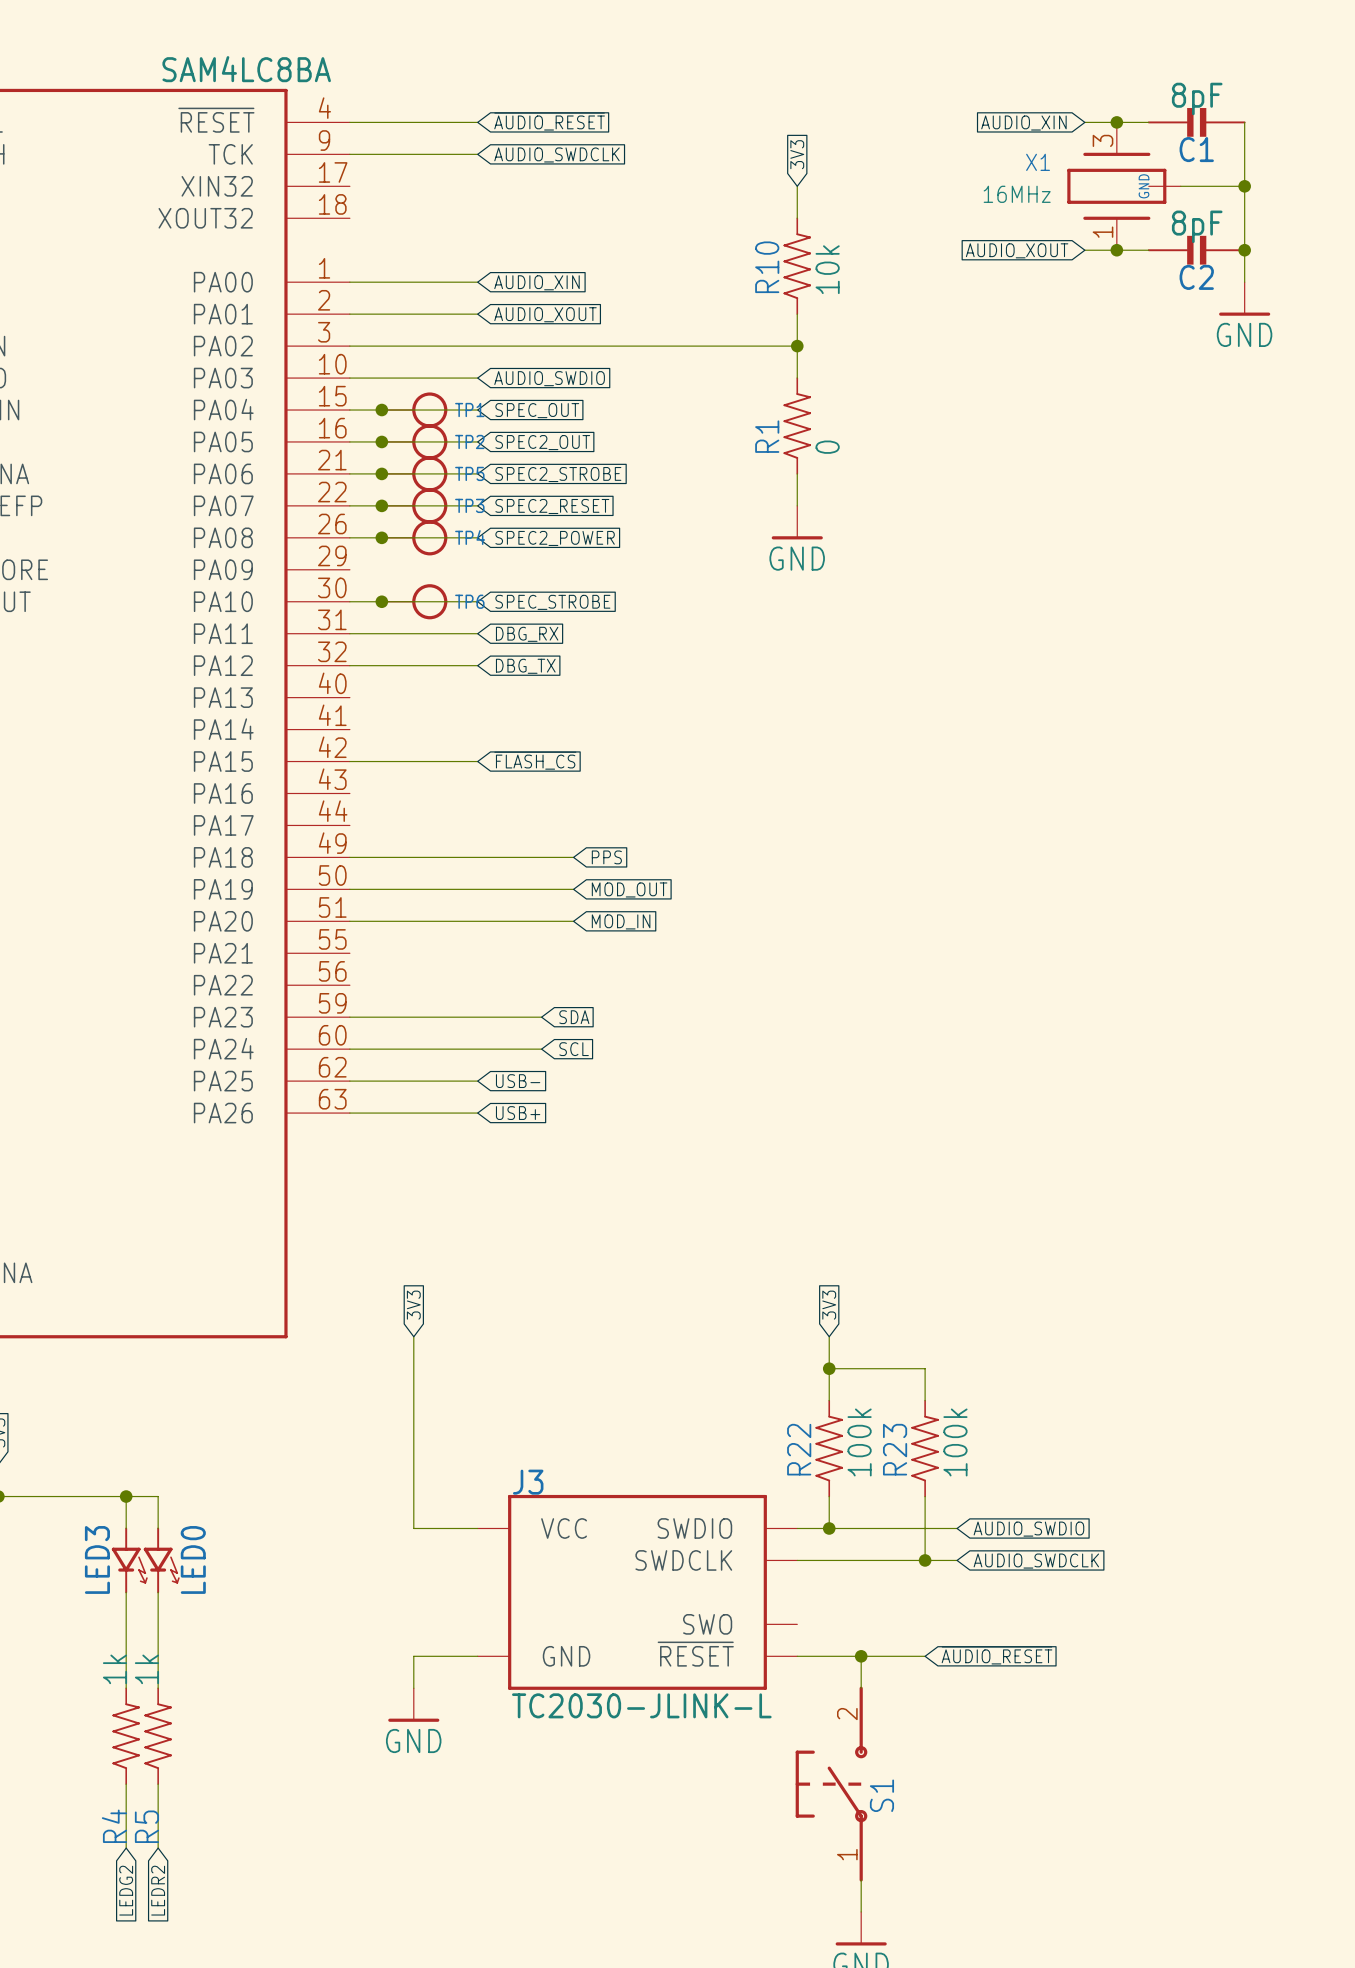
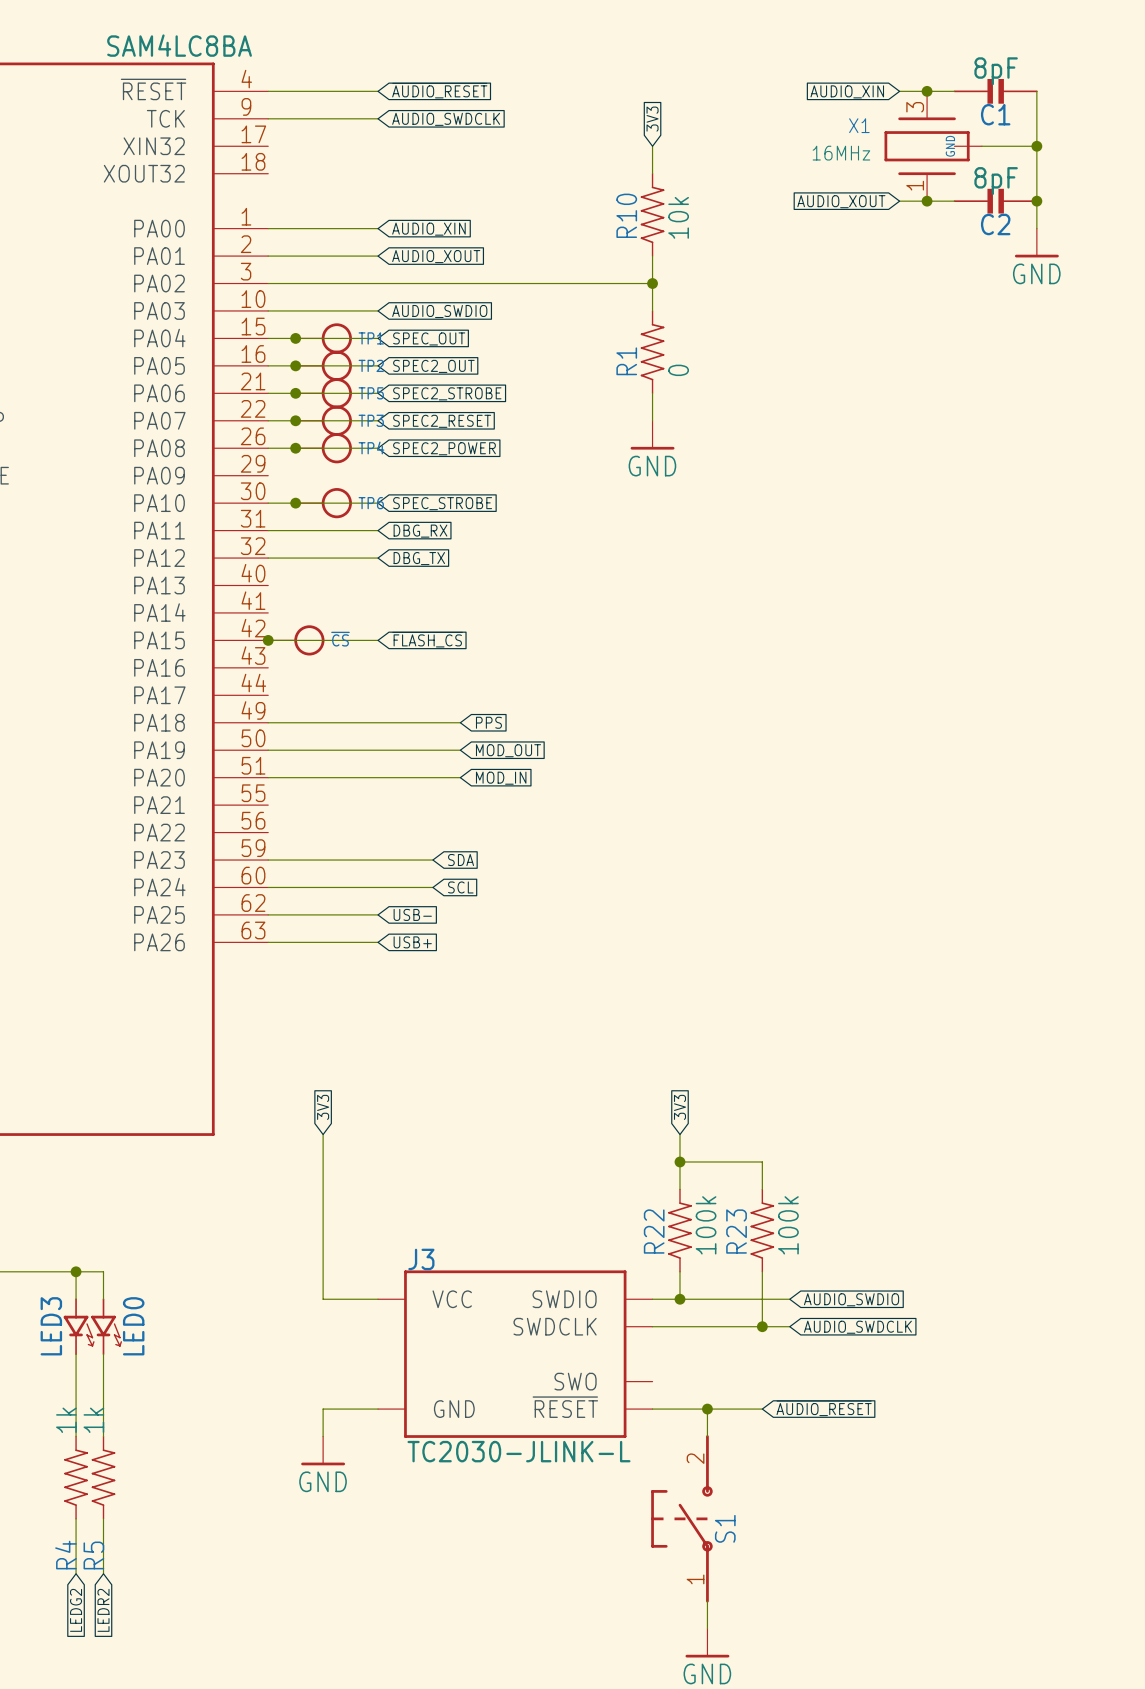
junction: none -> (268, 640)
~{CS}: none -> (296, 640)

